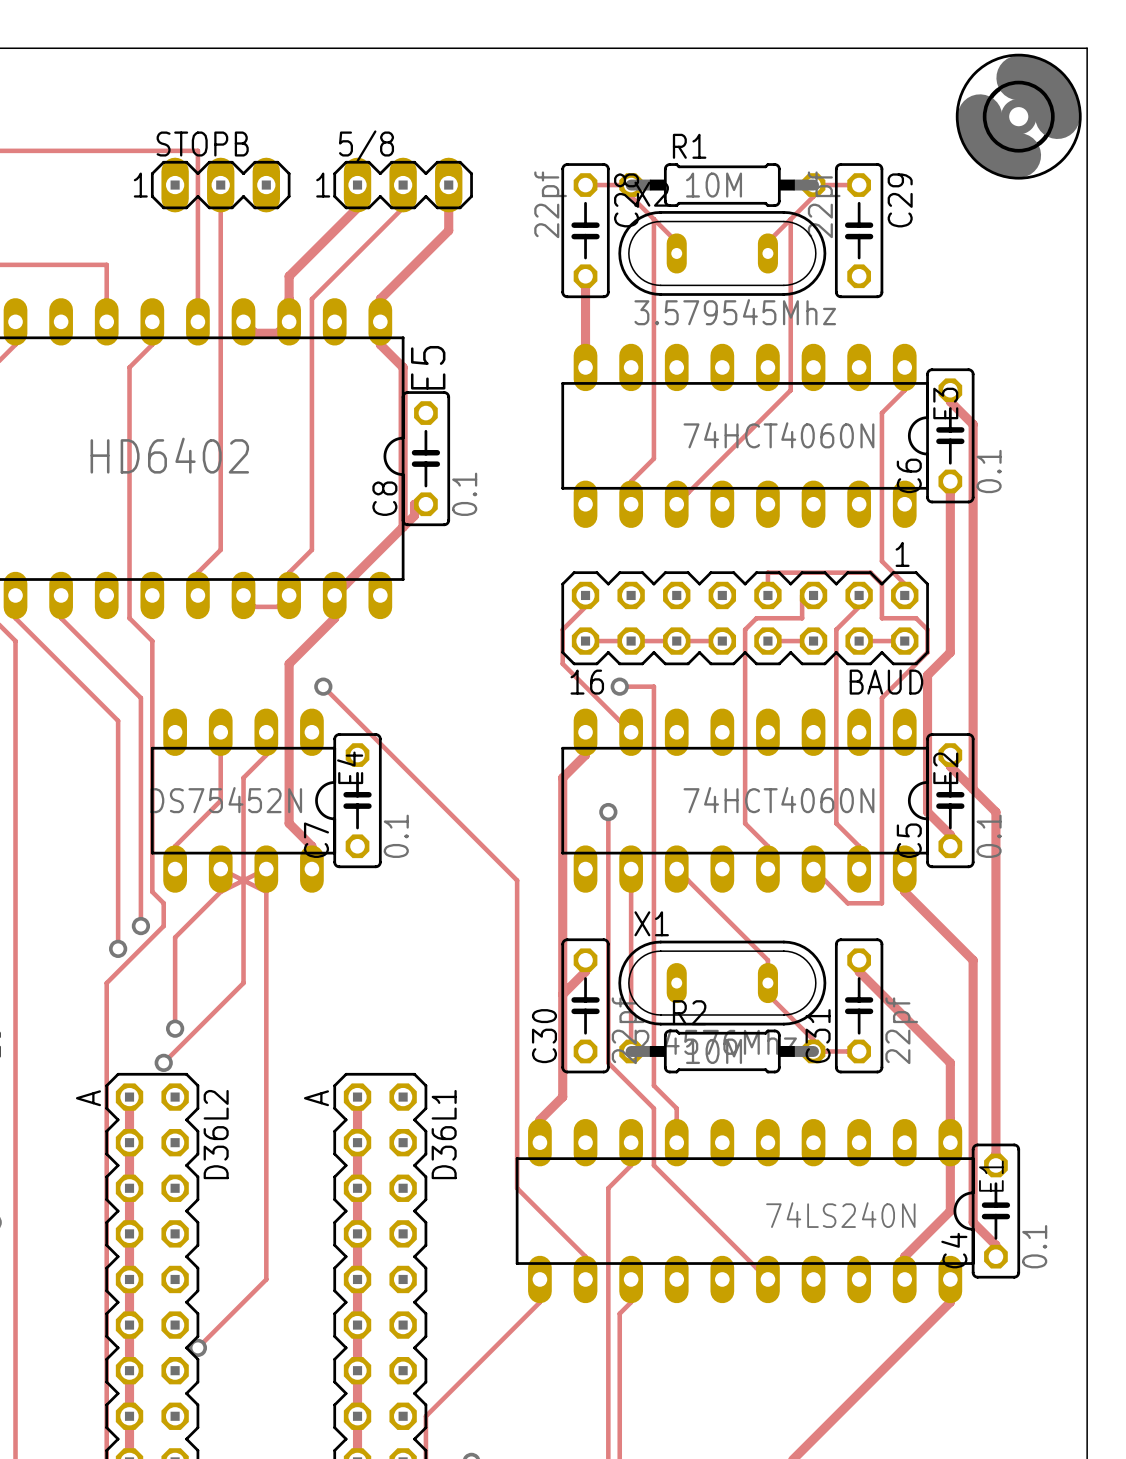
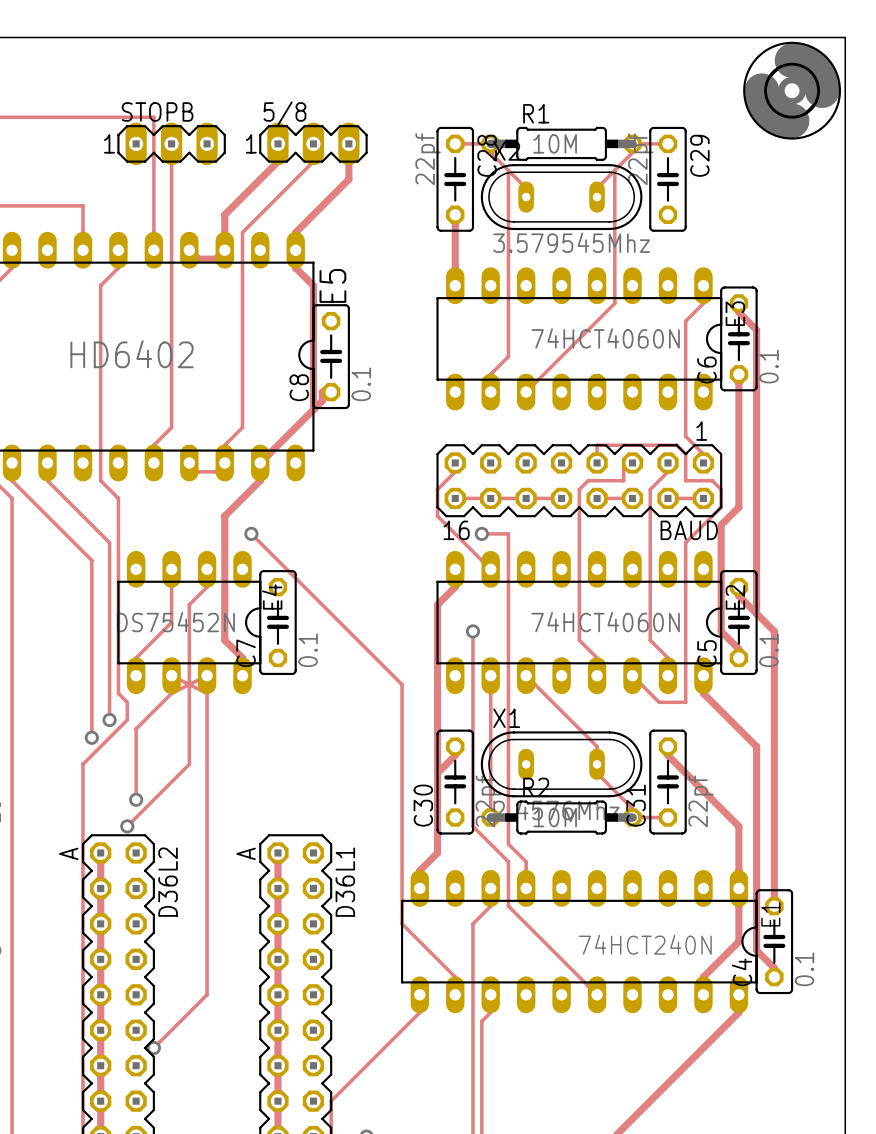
E1 value: 74LS240N (840, 1215) -> 74HCT240N (645, 944)

